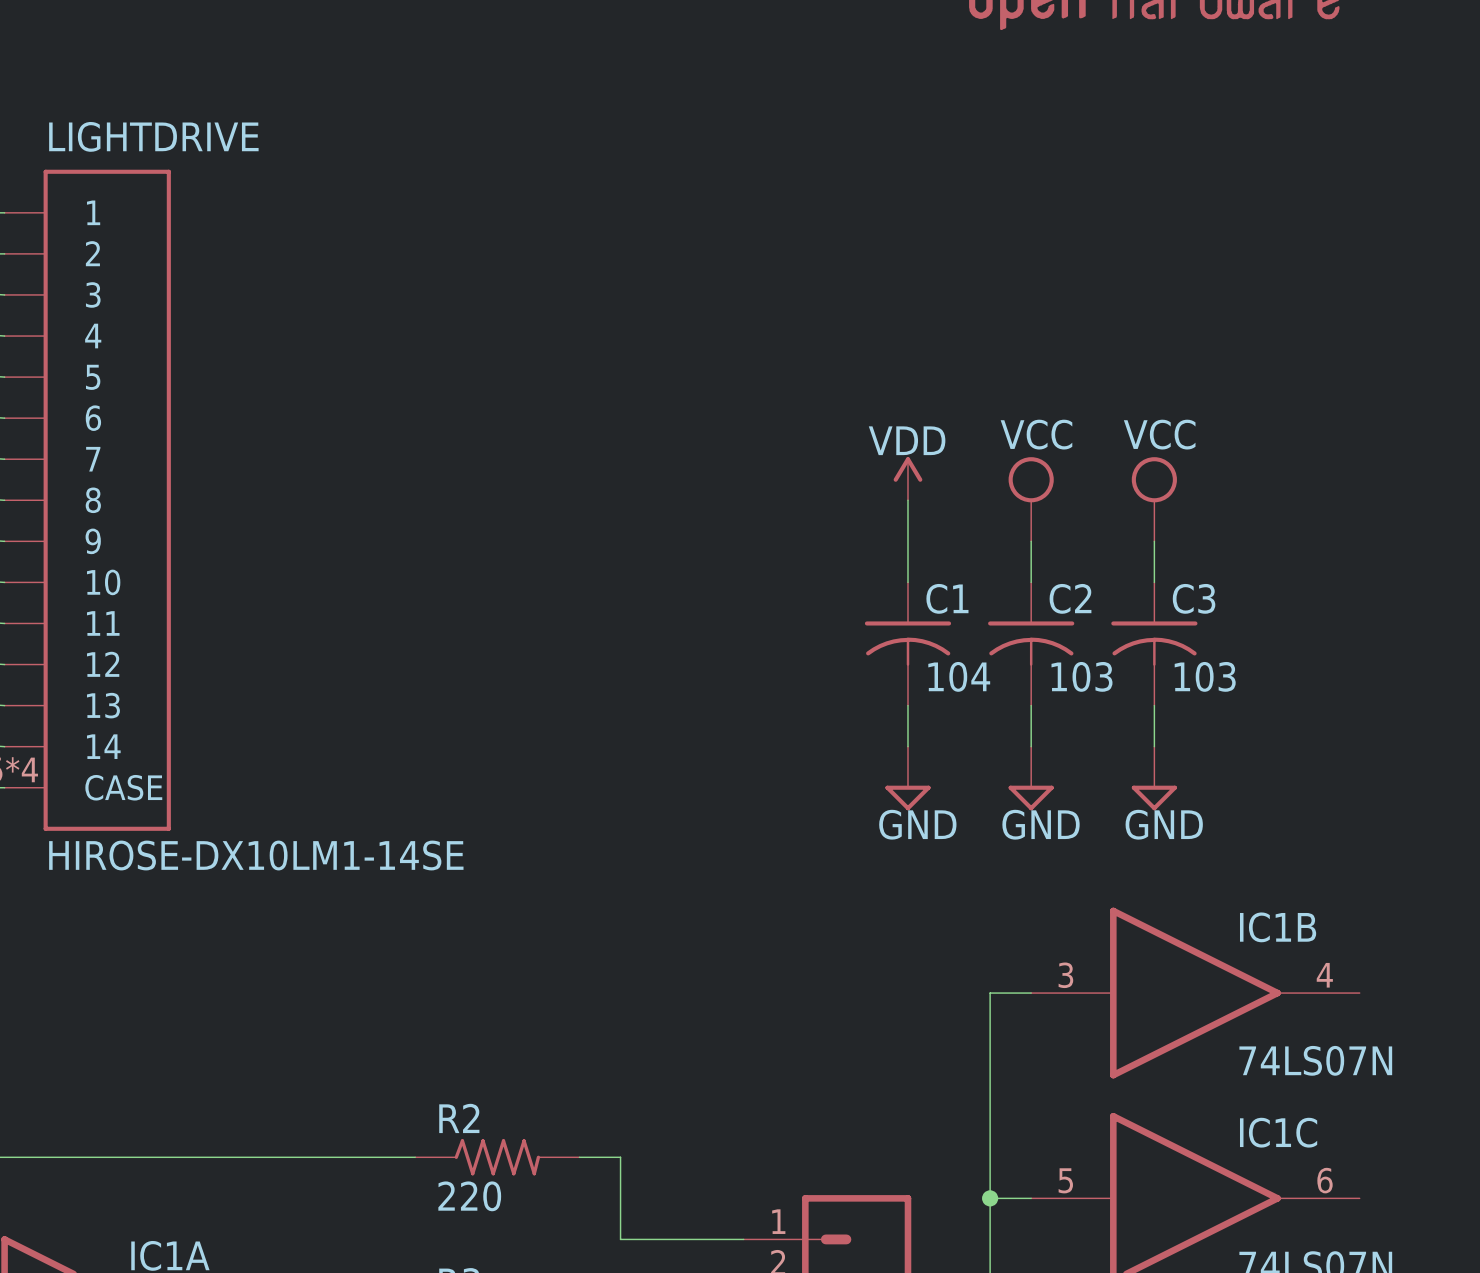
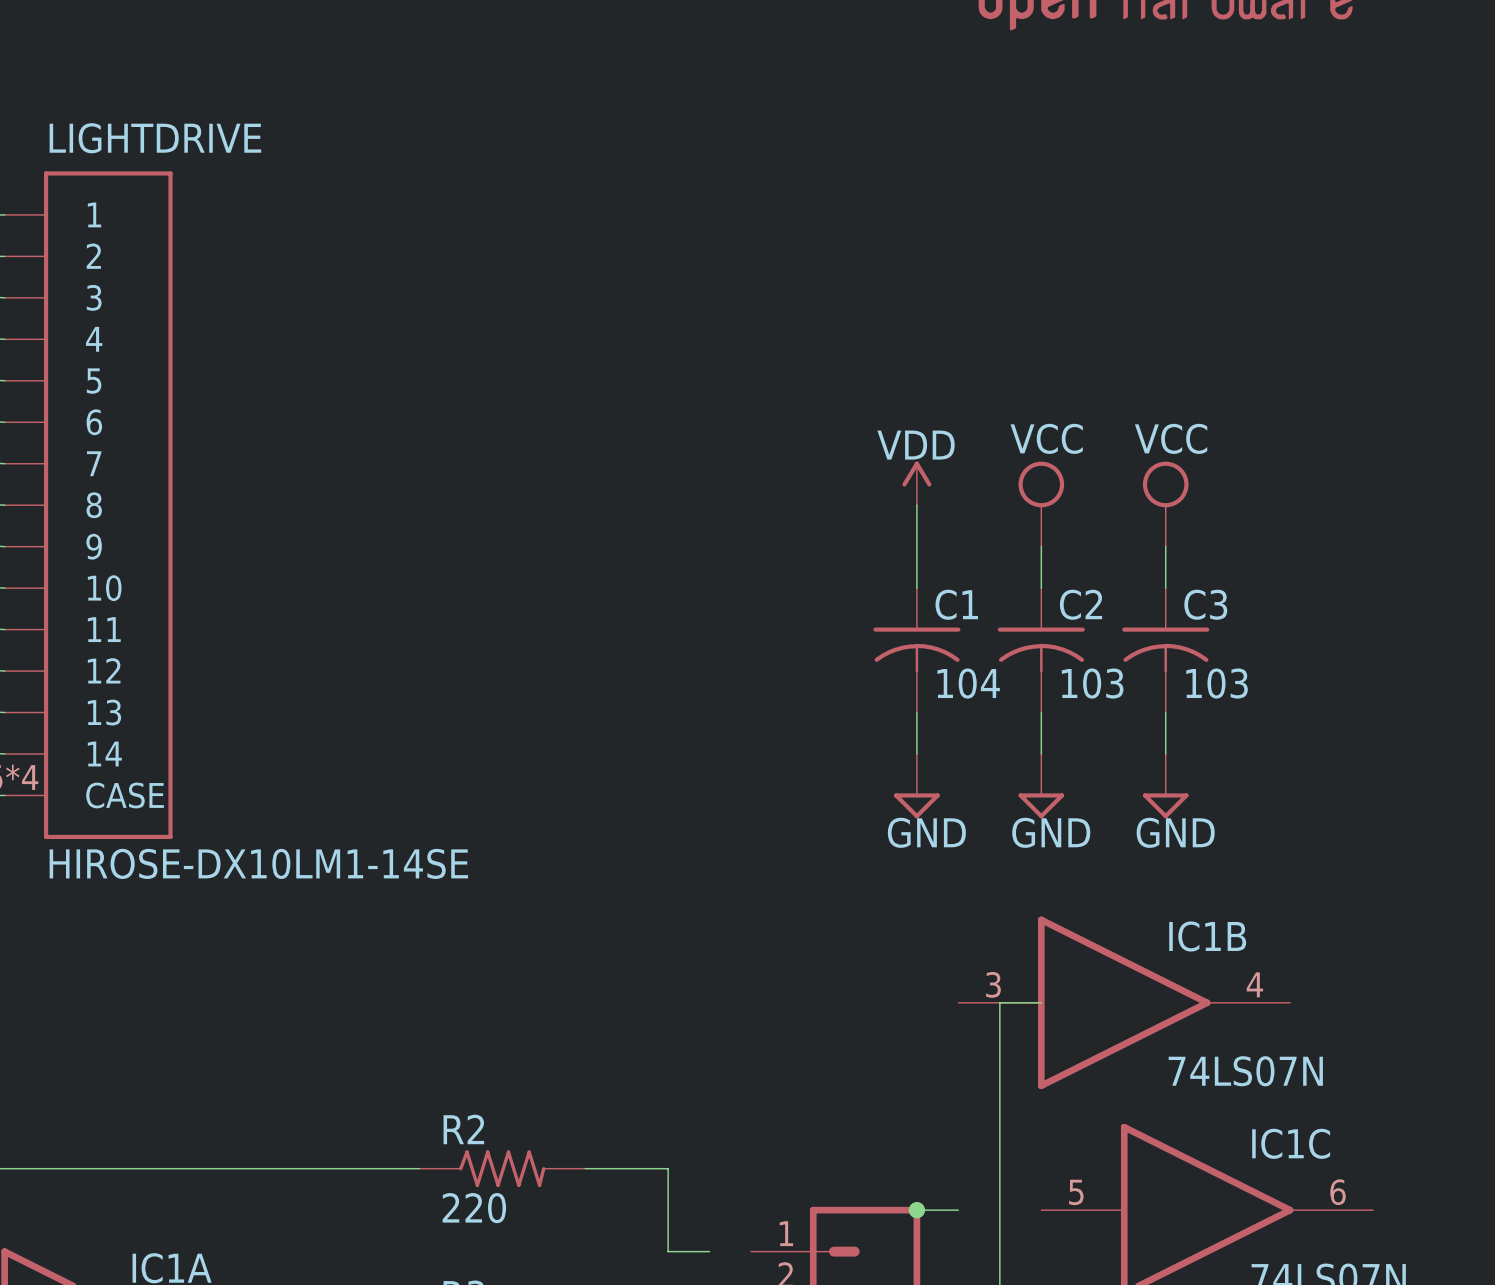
IC1B position: (1195, 993) -> (1124, 1002)
wire: (620, 1157) (620, 1239) (661, 1239) -> (626, 1168) (668, 1168) (668, 1251)
wire: (990, 1198) (1031, 1198) -> (916, 1210) (958, 1210)
junction position: (990, 1198) -> (916, 1210)
wire: (702, 1239) (743, 1239) -> none

